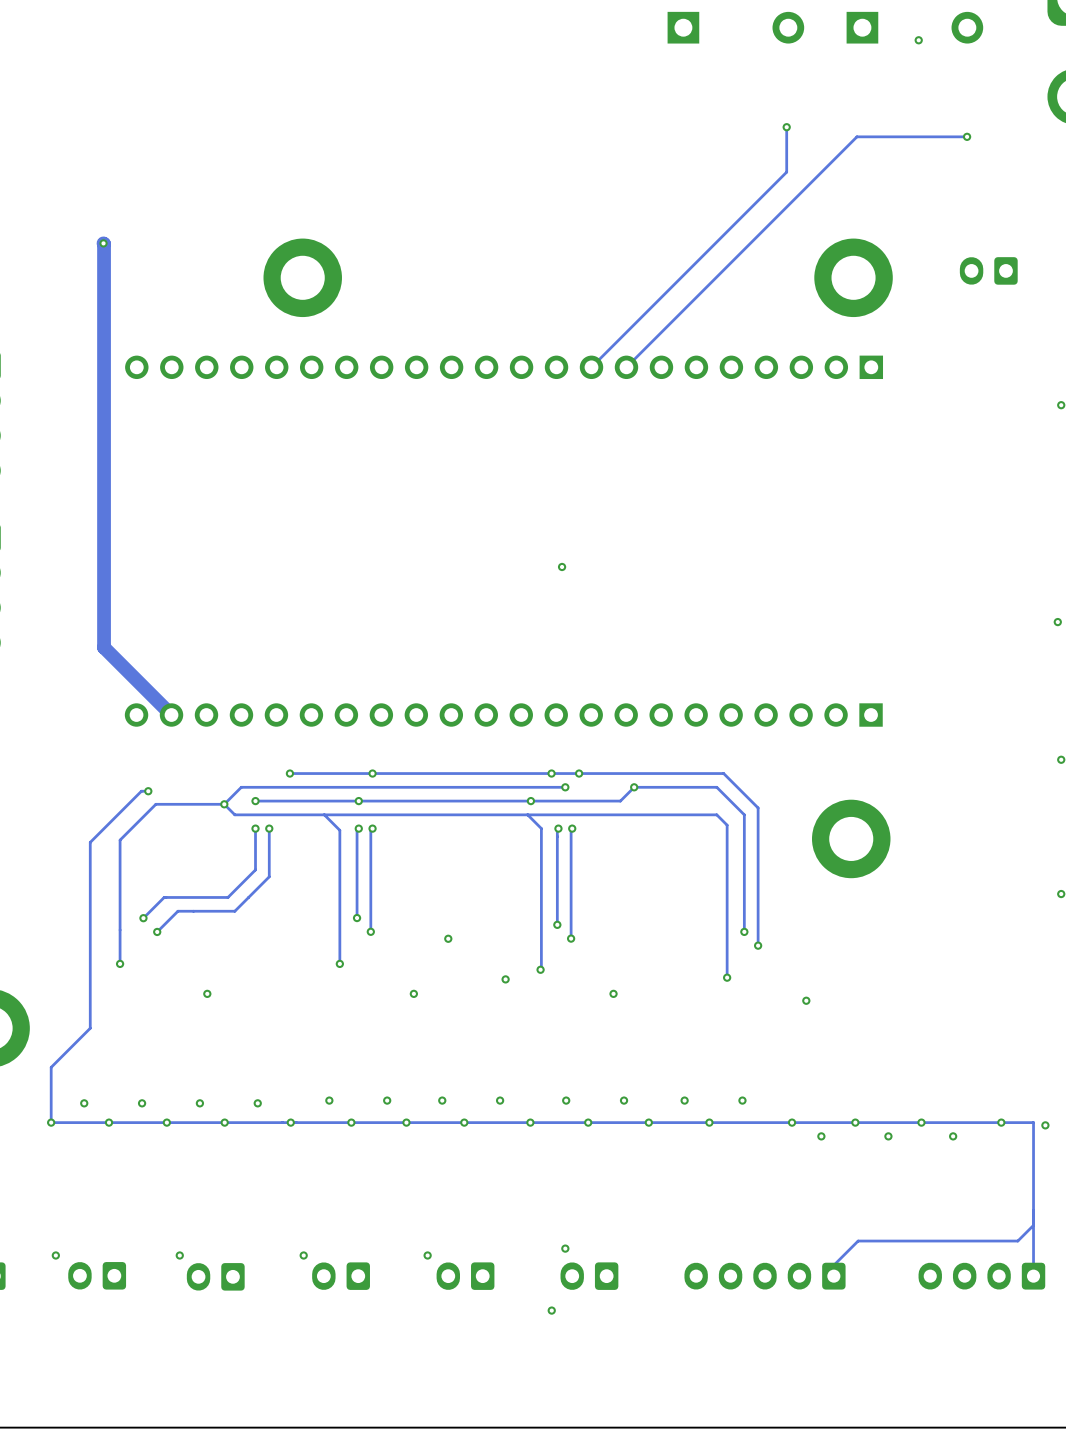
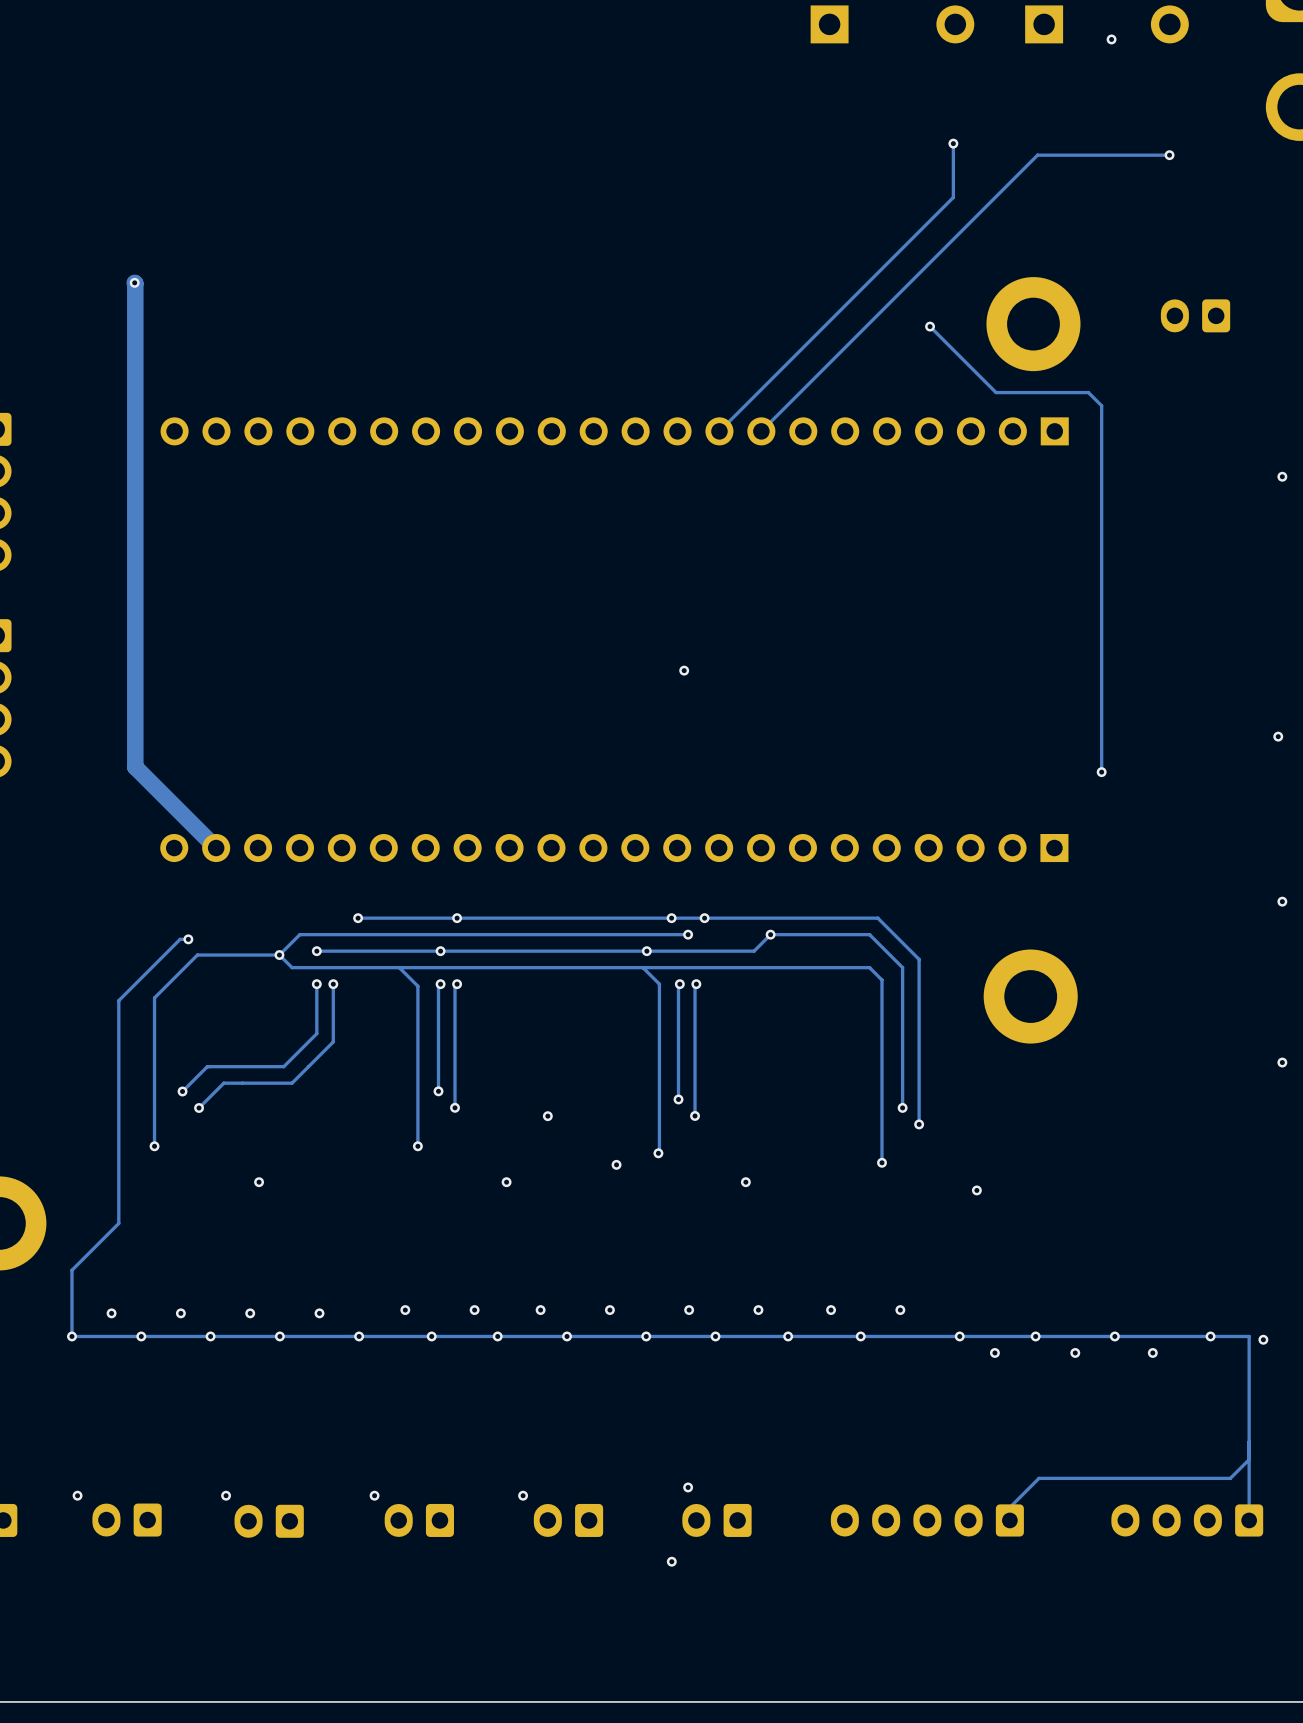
part: (302, 277) -> none
track: none -> (930, 326) (996, 392) (1088, 392) (1101, 405) (1101, 772)
via: none -> (930, 326)
via: none -> (1101, 772)

